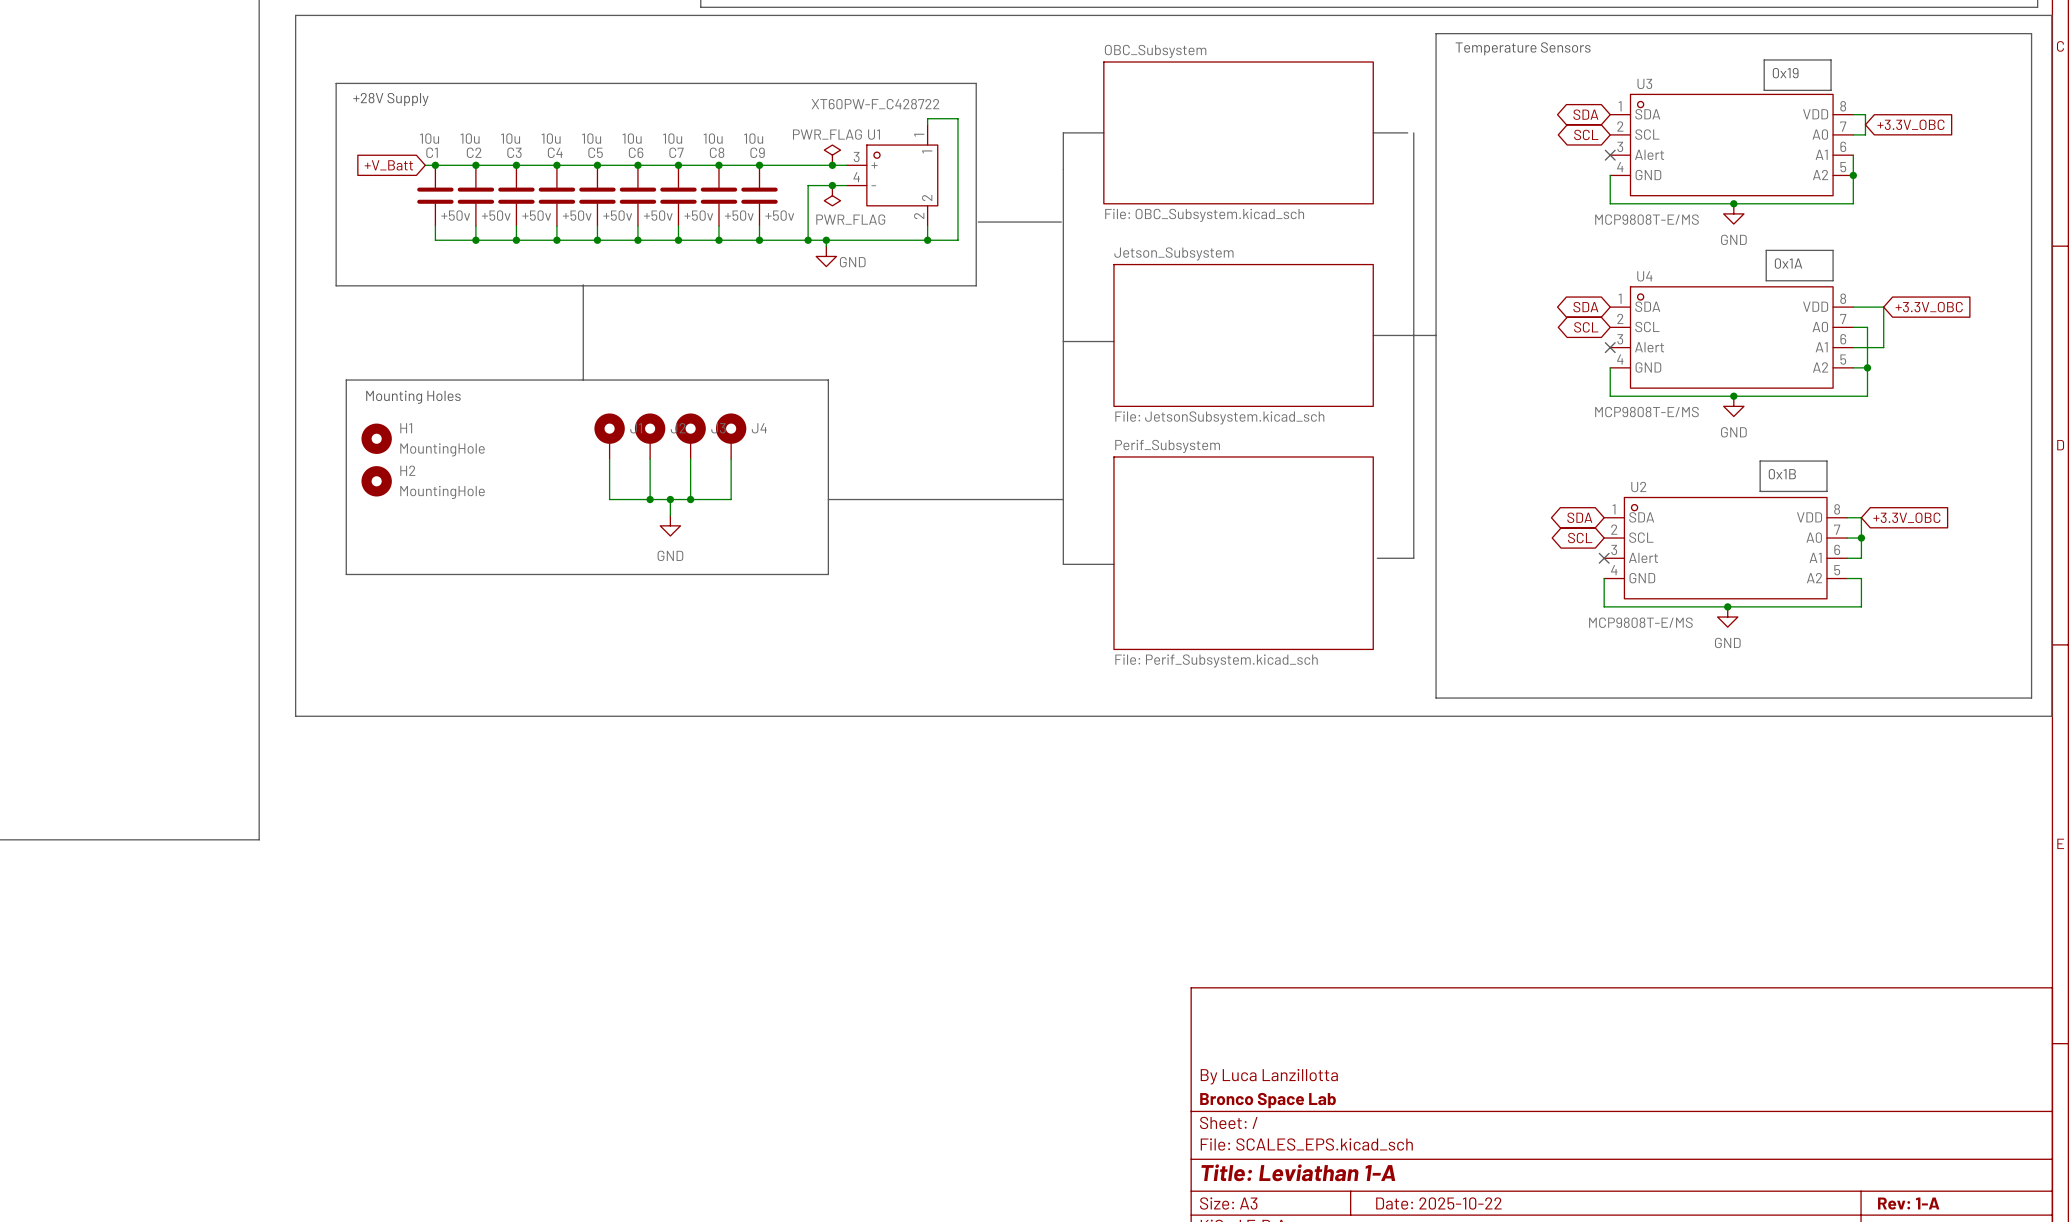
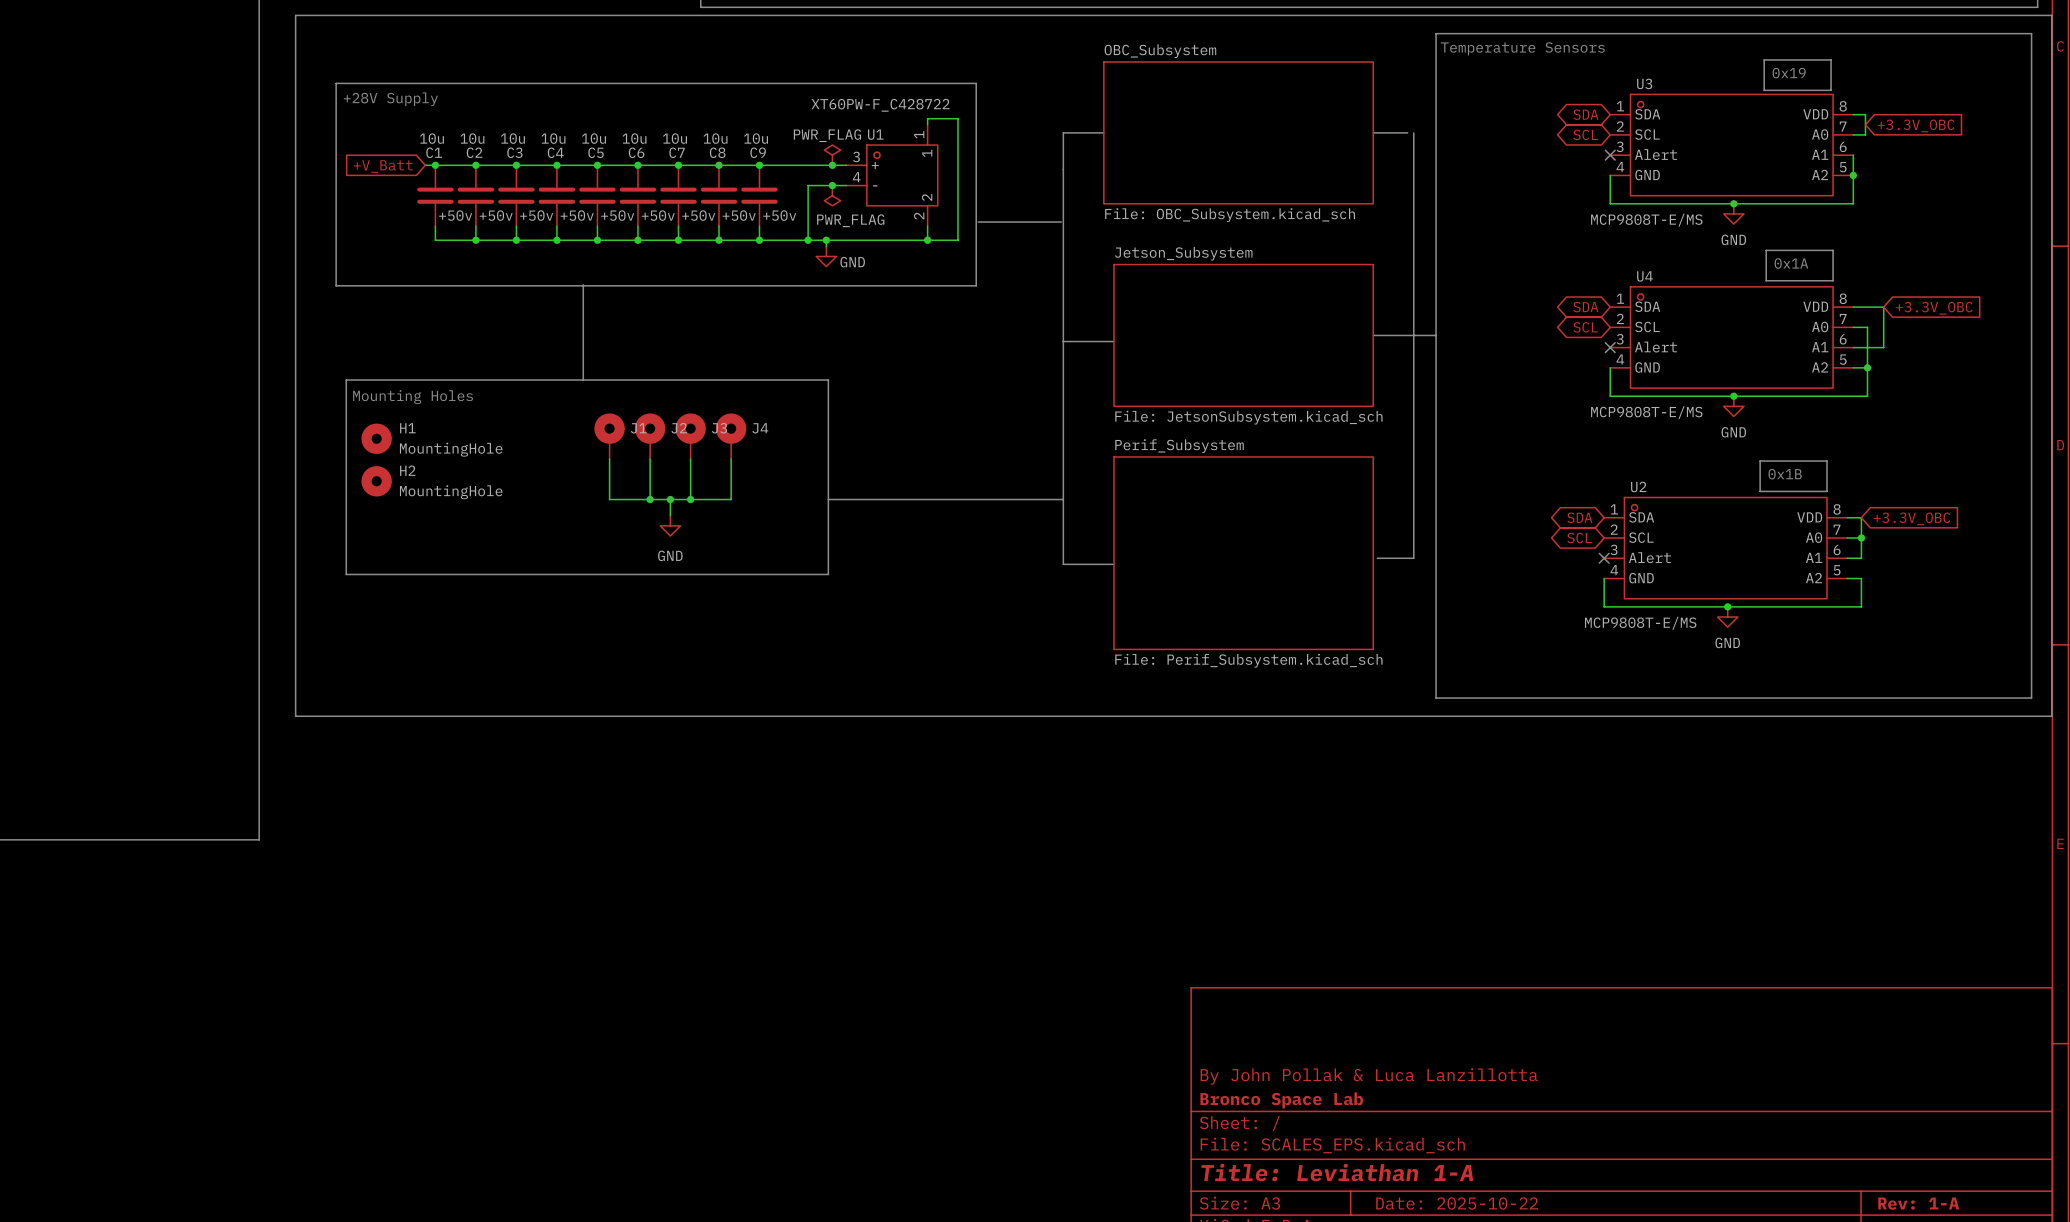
title block: By Luca Lanzillotta (1269, 1076) -> By John Pollak & Luca Lanzillotta (1369, 1076)

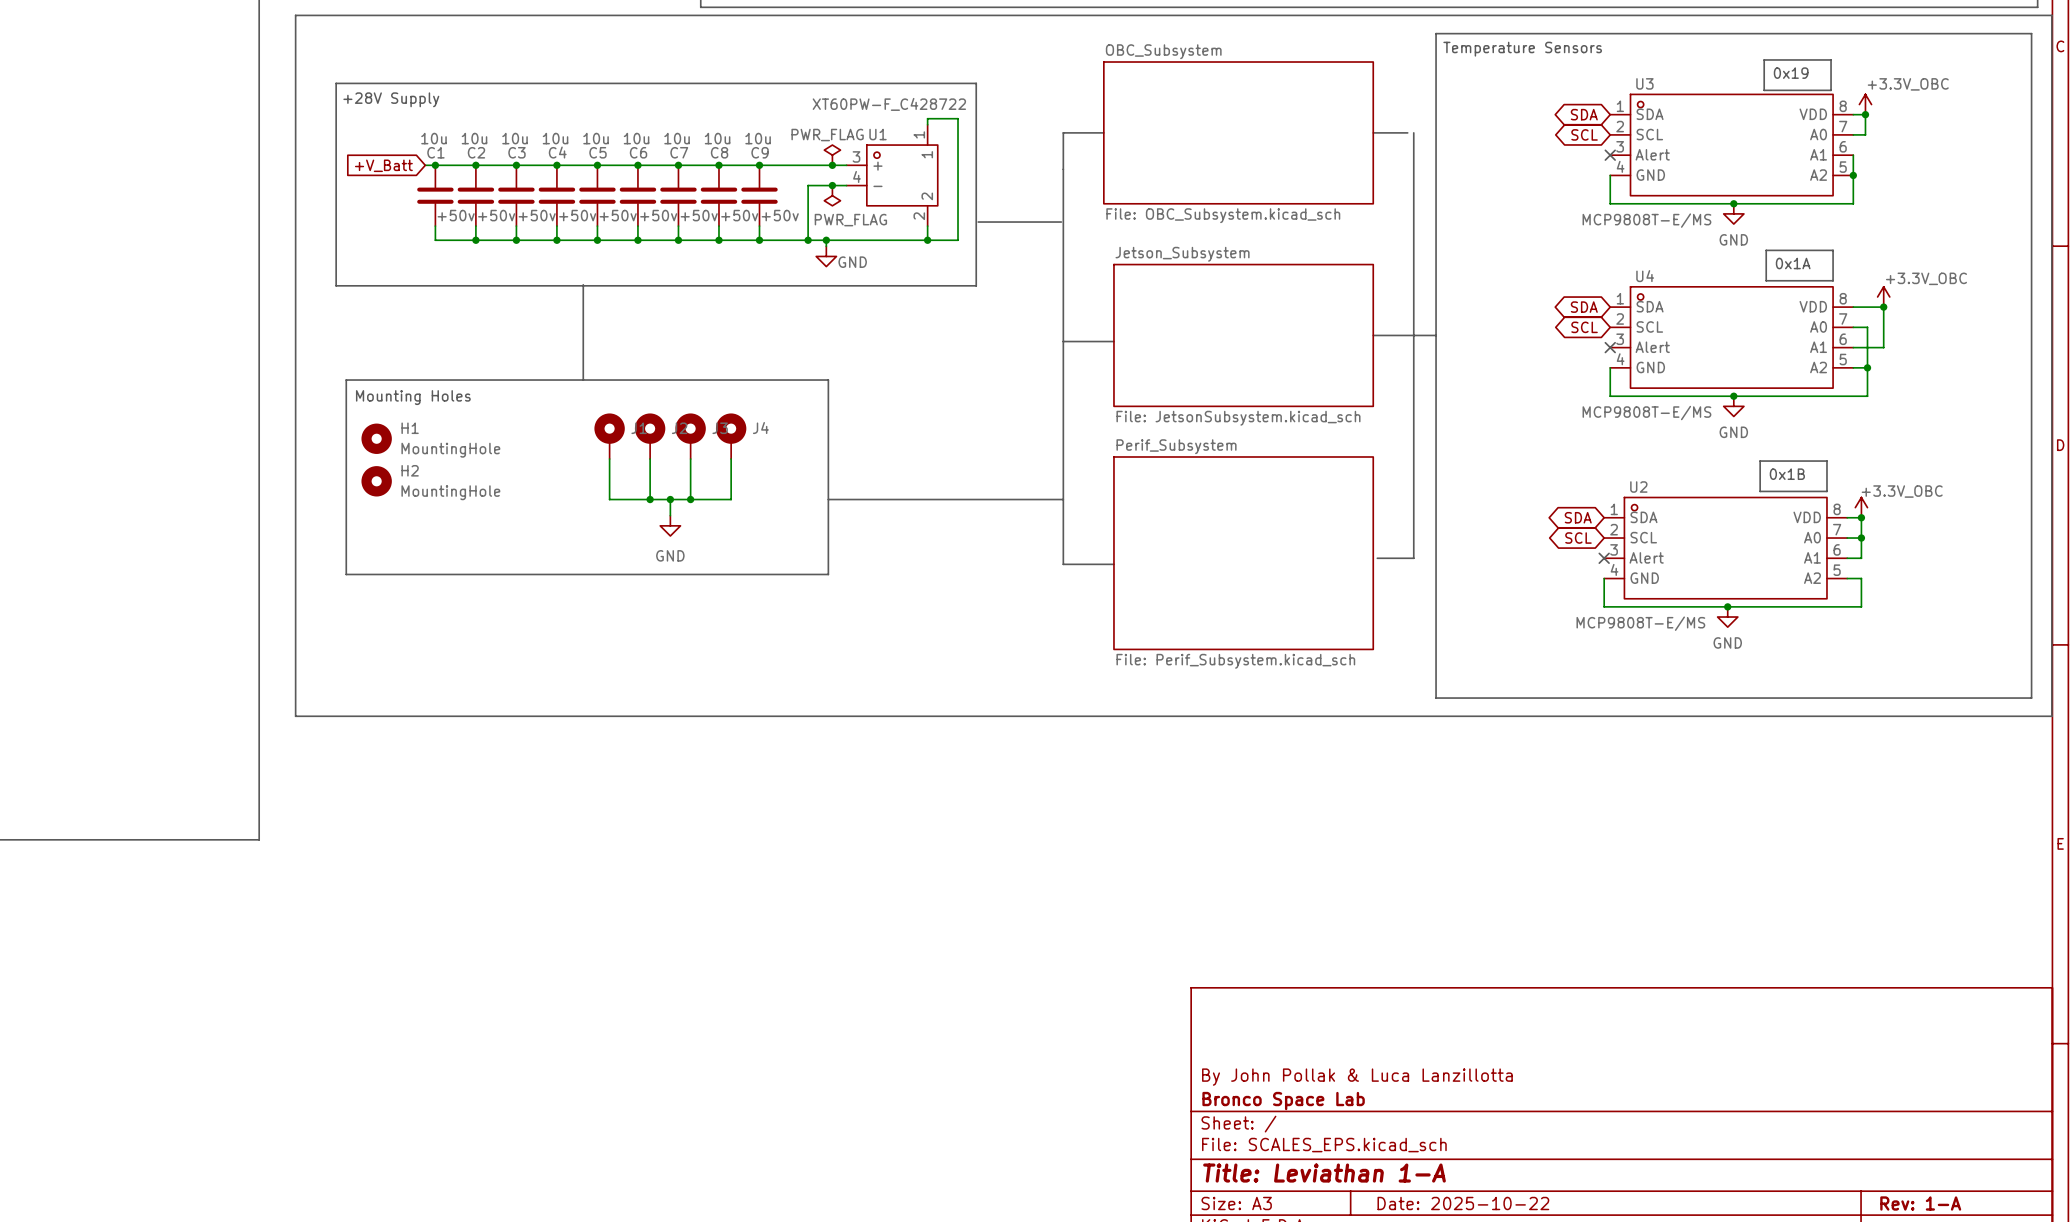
power symbol: none -> +3.3V_OBC (1865, 104)
junction: none -> (1865, 114)
global label: +3.3V_OBC (1916, 125) -> none
power symbol: none -> +3.3V_OBC (1883, 296)
junction: none -> (1883, 307)
global label: +3.3V_OBC (1934, 308) -> none
power symbol: none -> +3.3V_OBC (1861, 507)
junction: none -> (1861, 517)
global label: +3.3V_OBC (1911, 518) -> none

